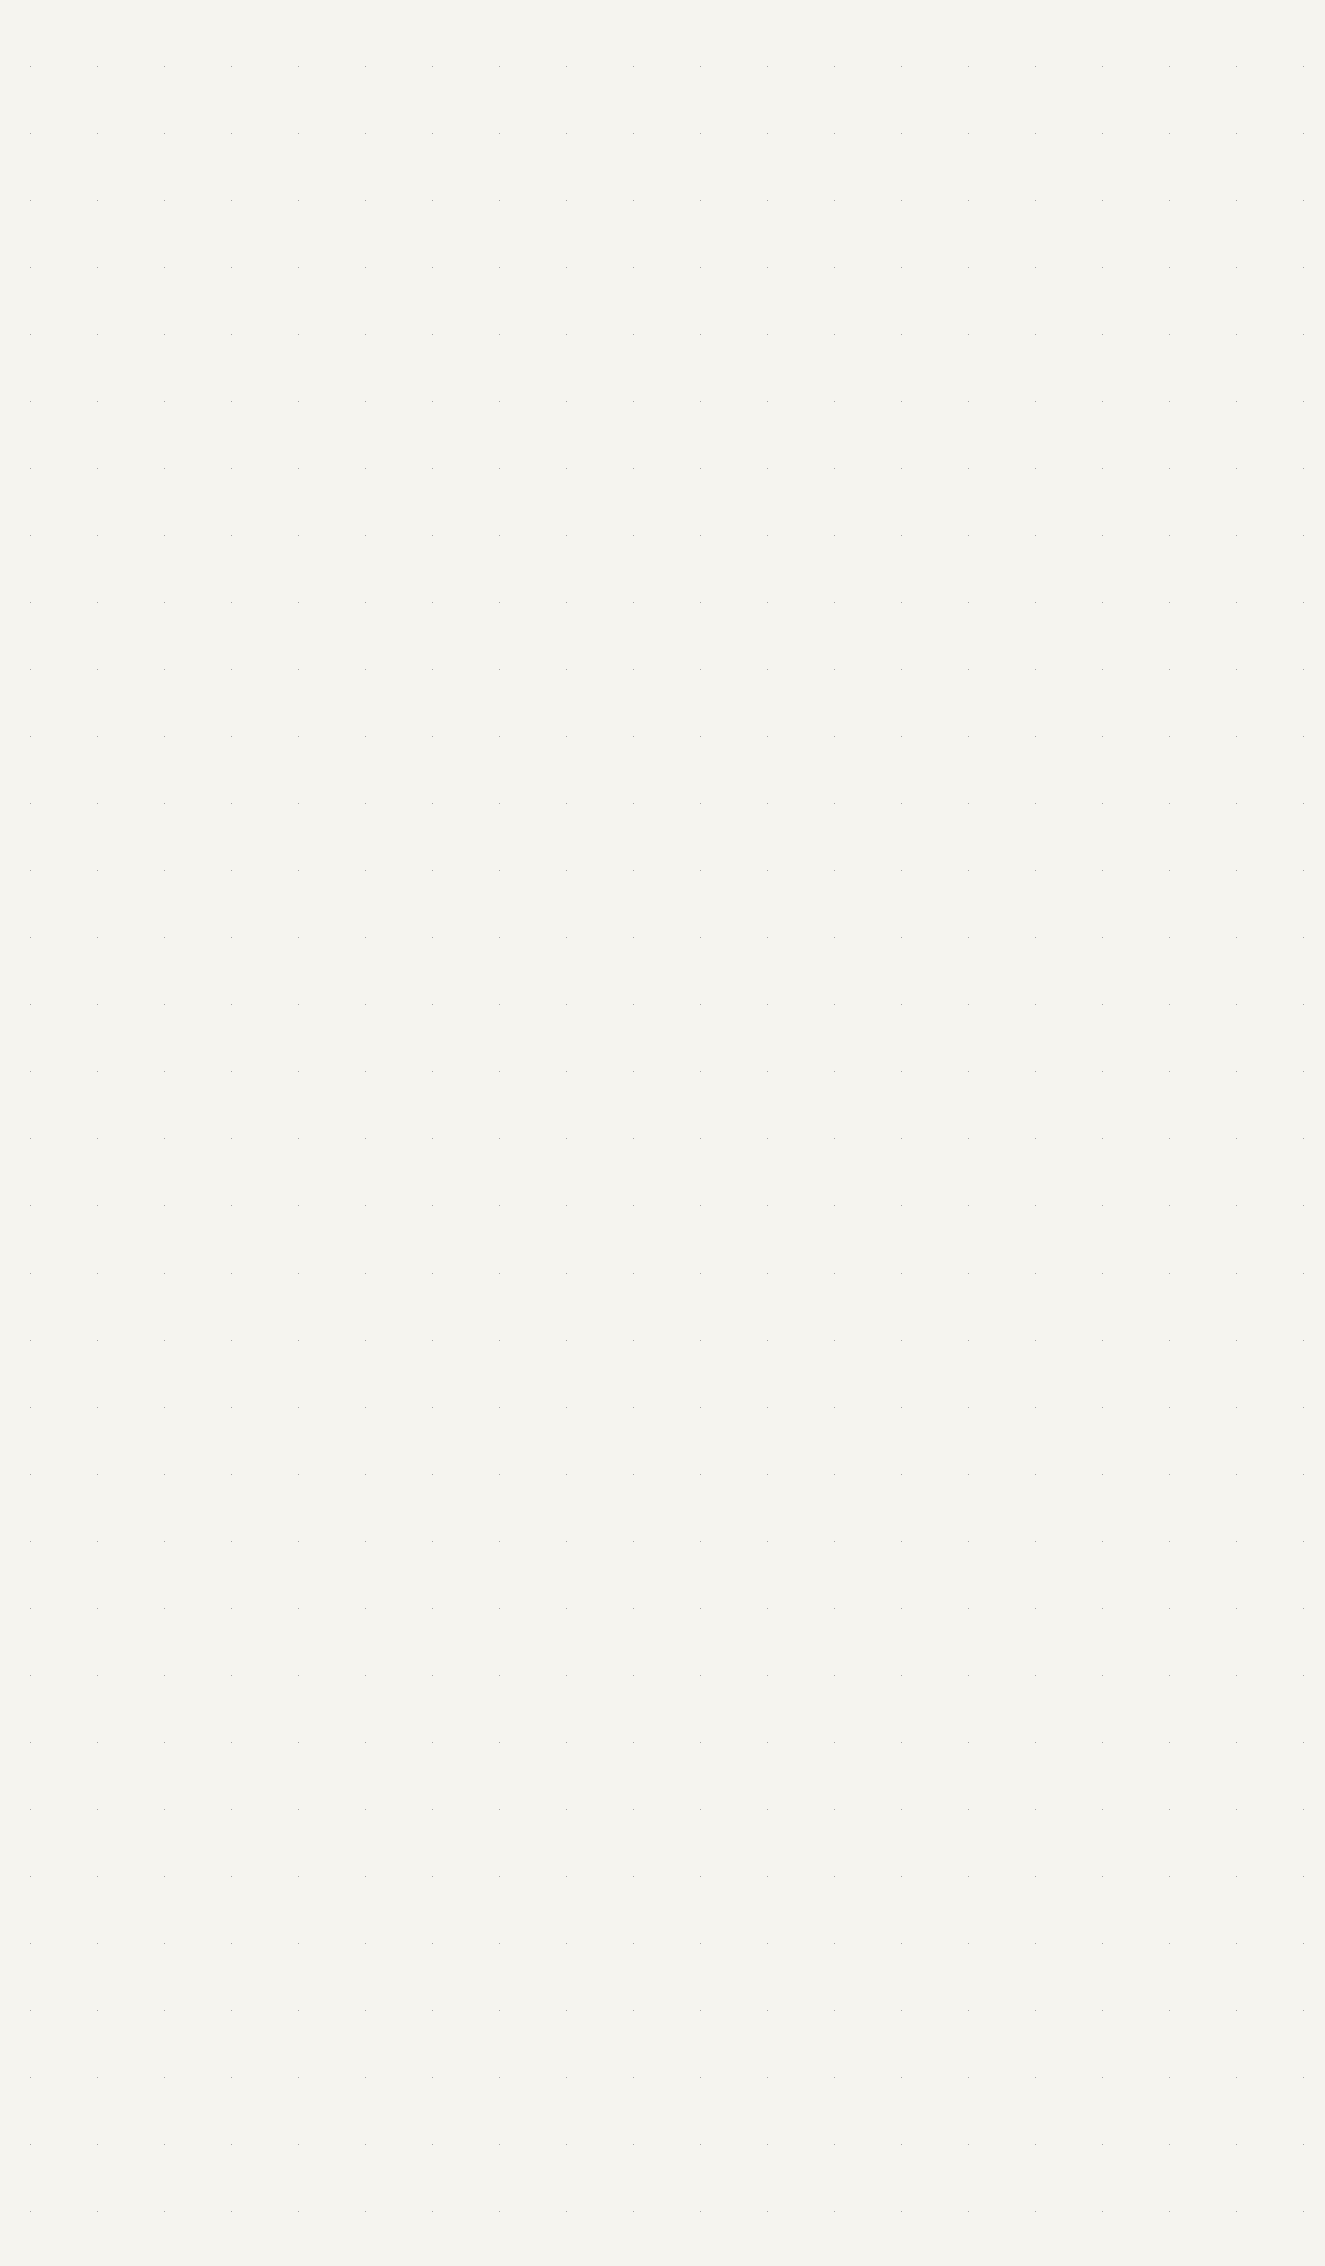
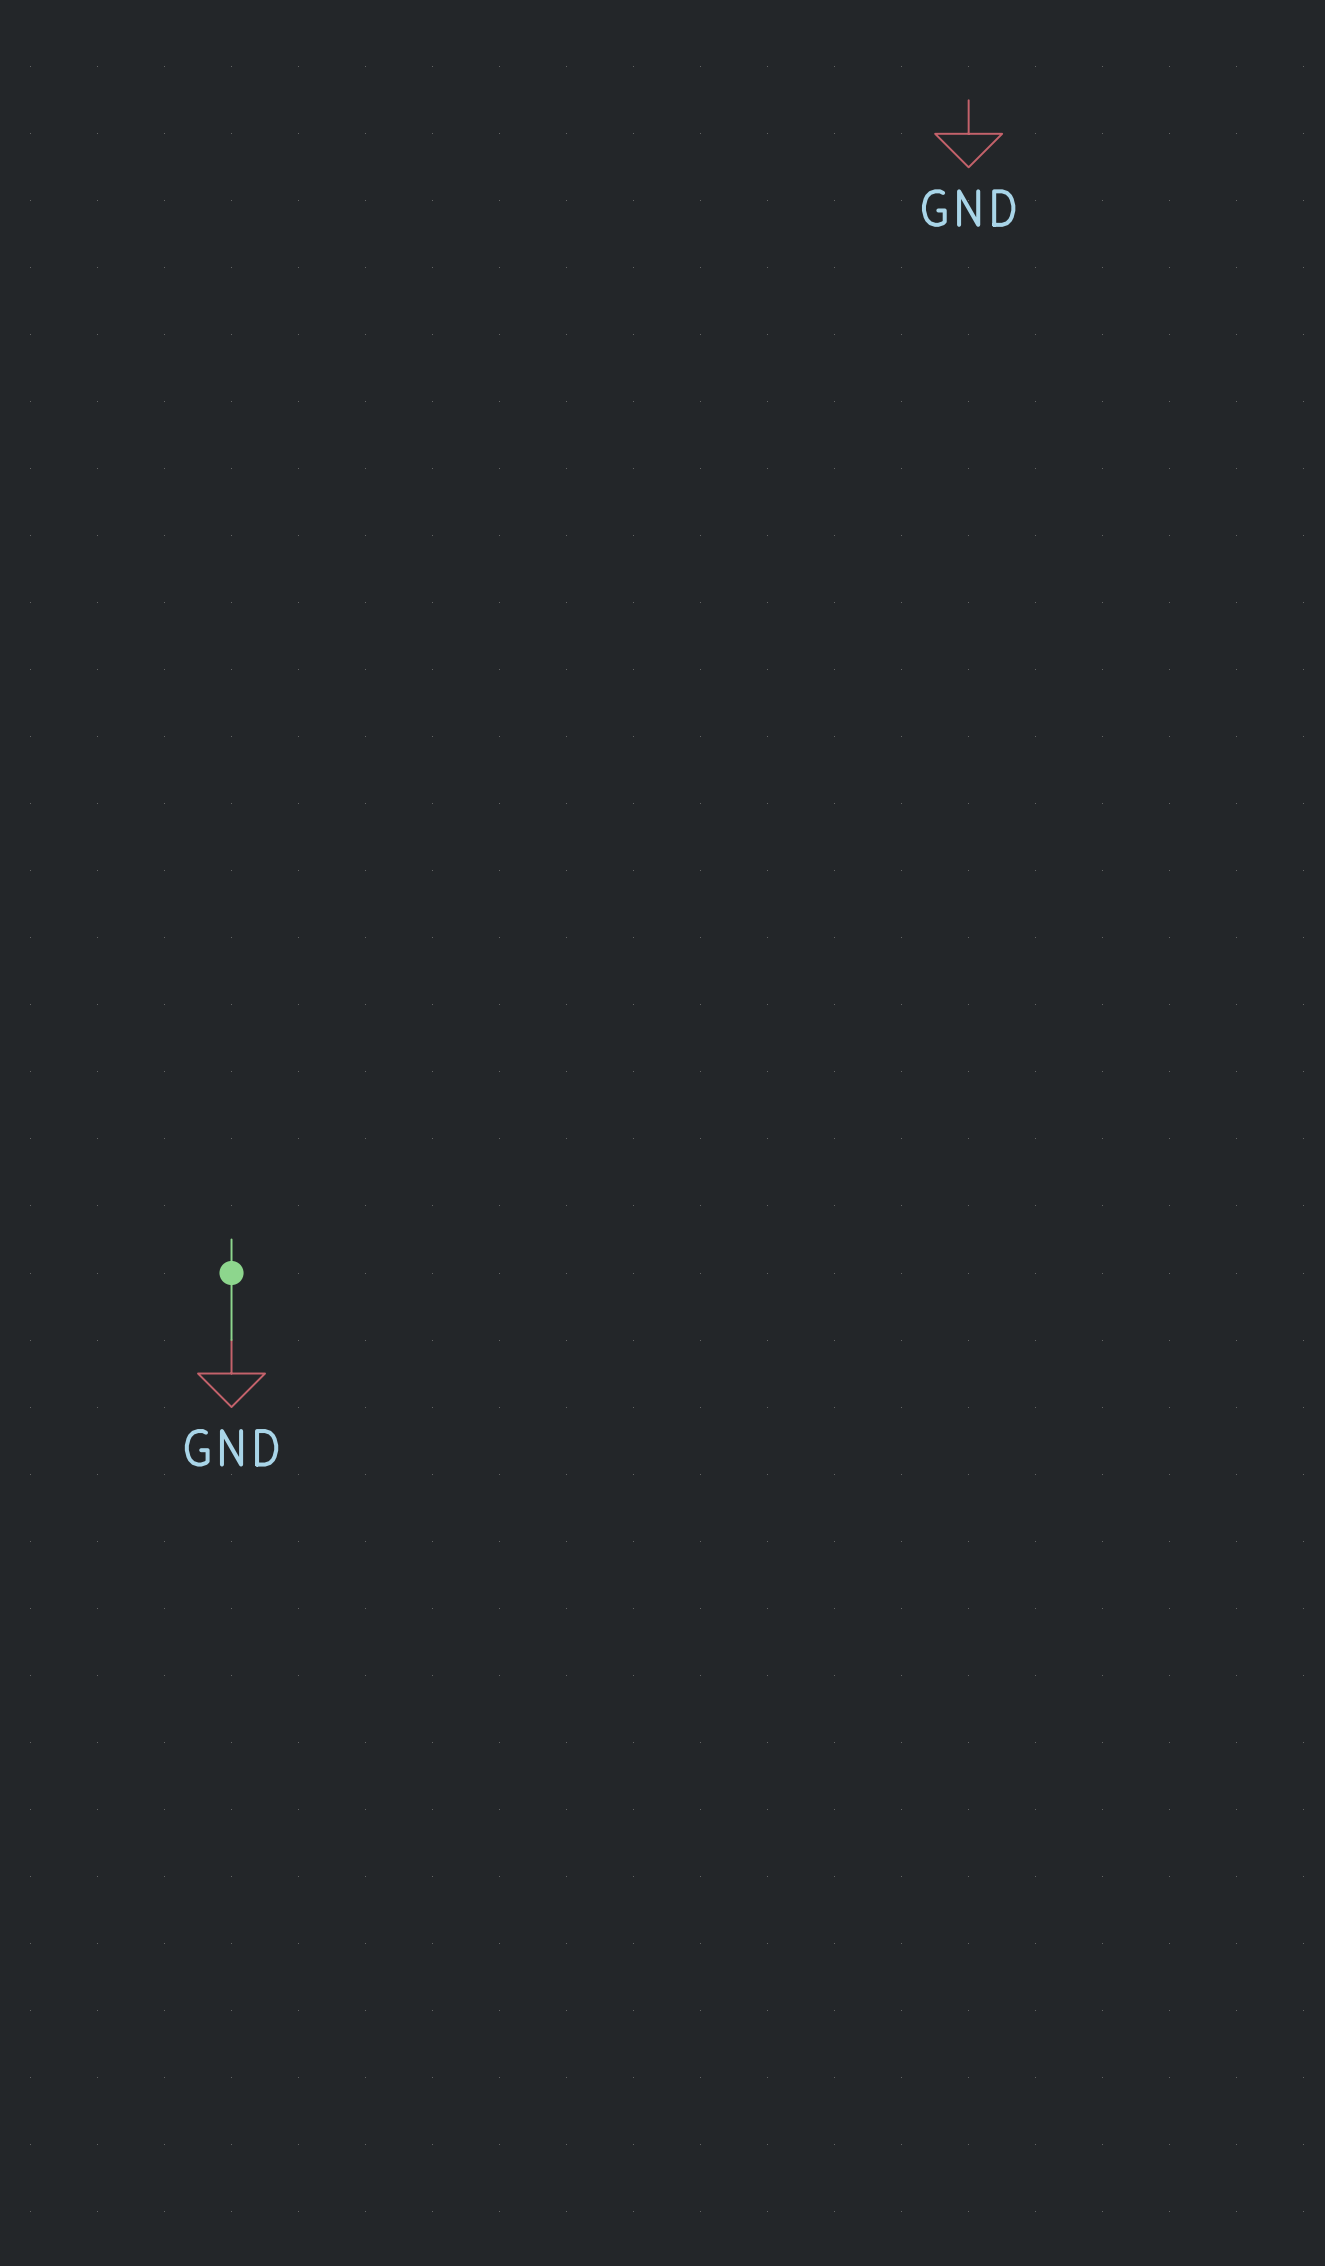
power symbol: none -> GND (968, 133)
wire: none -> (231, 1239) (231, 1340)
junction: none -> (231, 1273)
power symbol: none -> GND (231, 1373)

